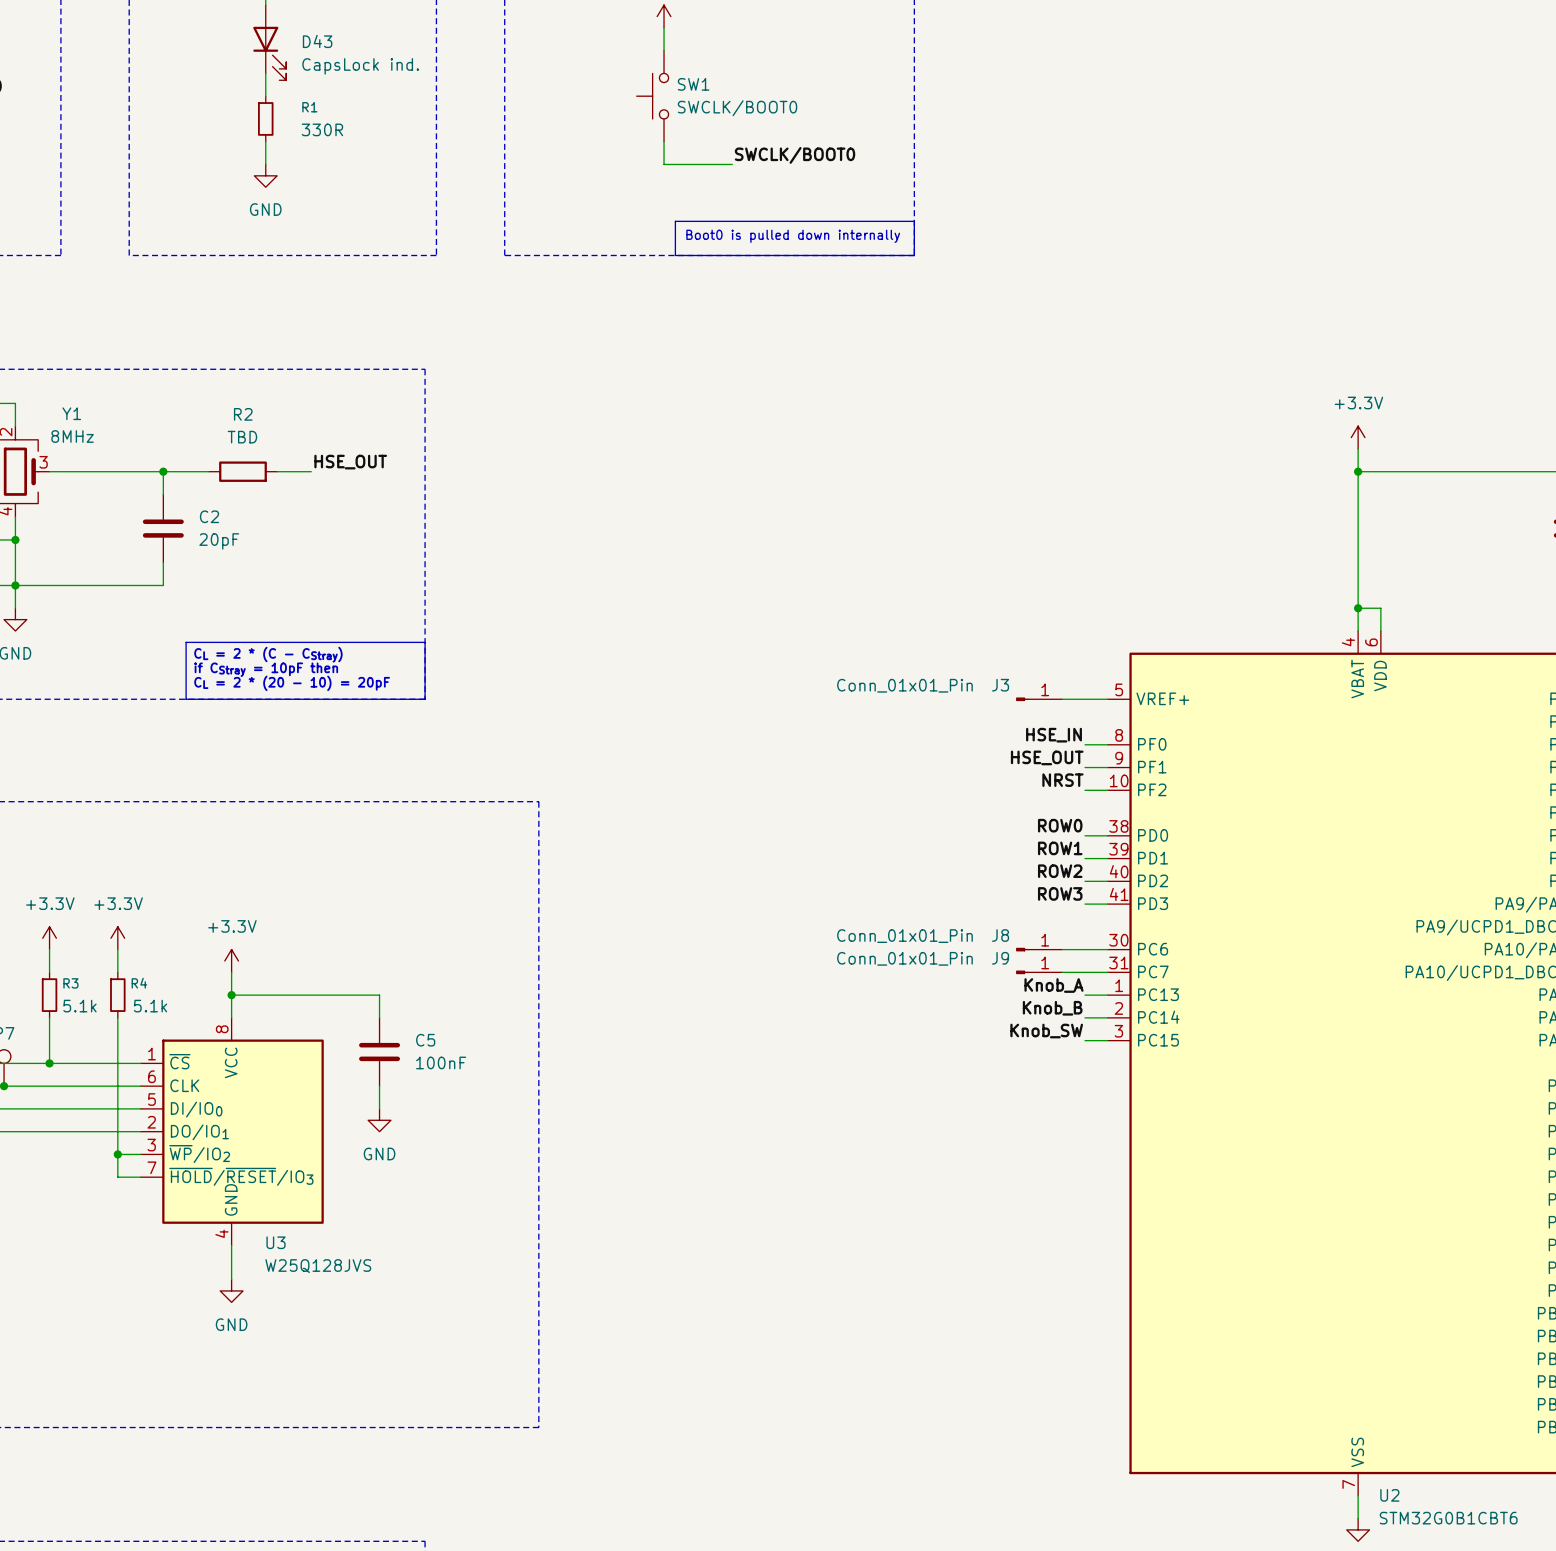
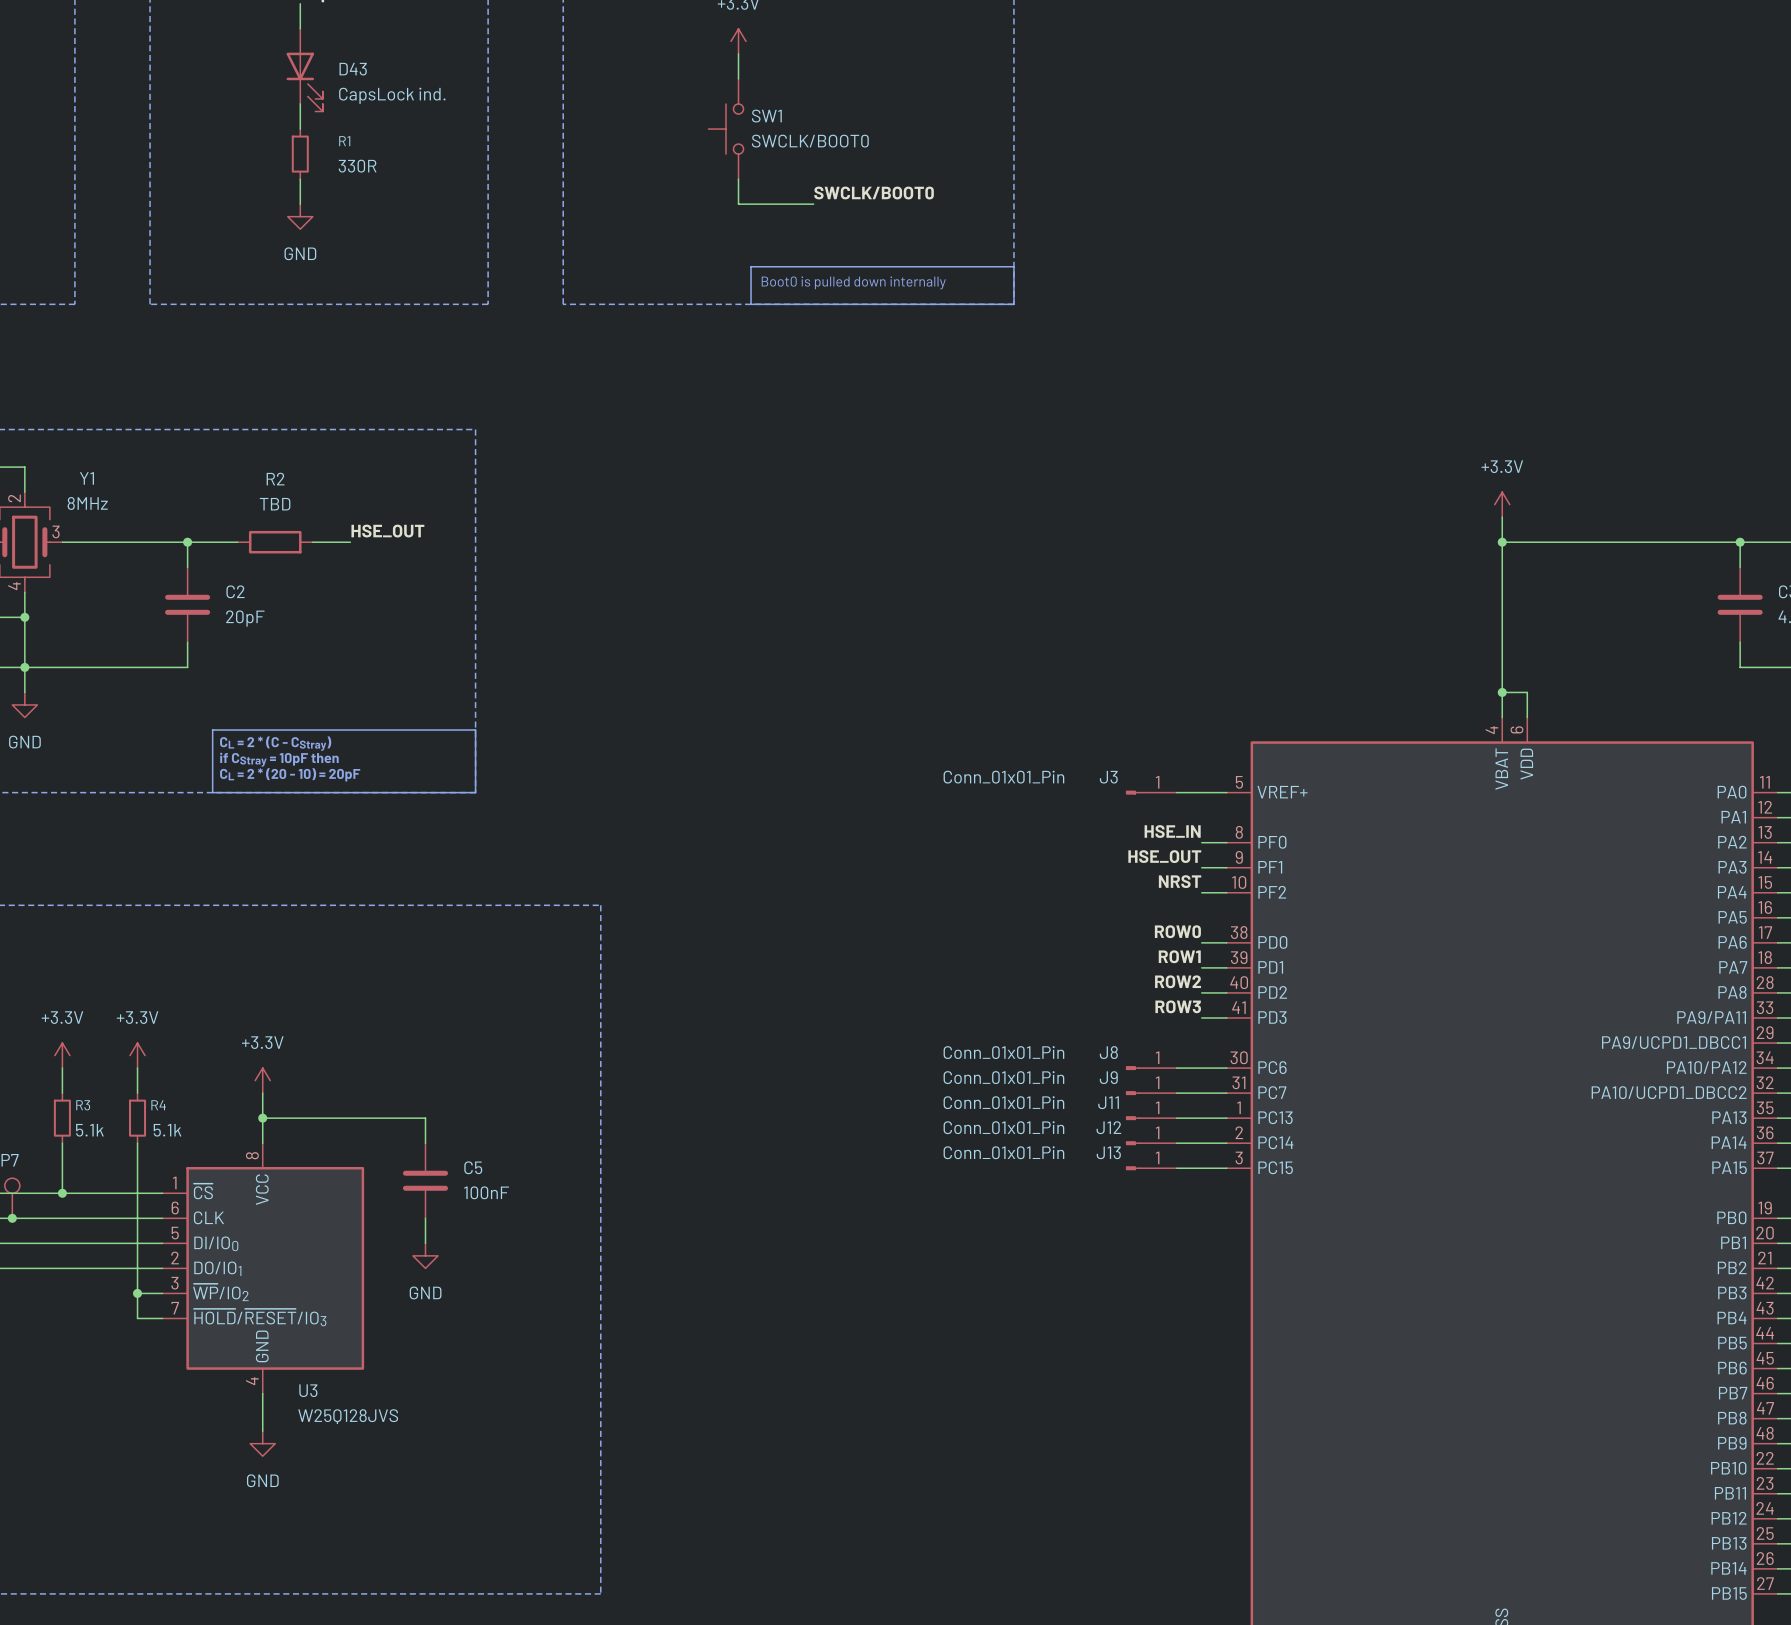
label: Knob_A (1054, 985) -> none
J11: none -> Conn_01x01_Pin (1151, 1118)
wire: none -> (1176, 1118) (1201, 1118)
label: Knob_B (1052, 1008) -> none
J12: none -> Conn_01x01_Pin (1151, 1143)
wire: none -> (1176, 1143) (1201, 1143)
label: Knob_SW (1046, 1031) -> none
J13: none -> Conn_01x01_Pin (1151, 1168)
wire: none -> (1176, 1168) (1201, 1168)

